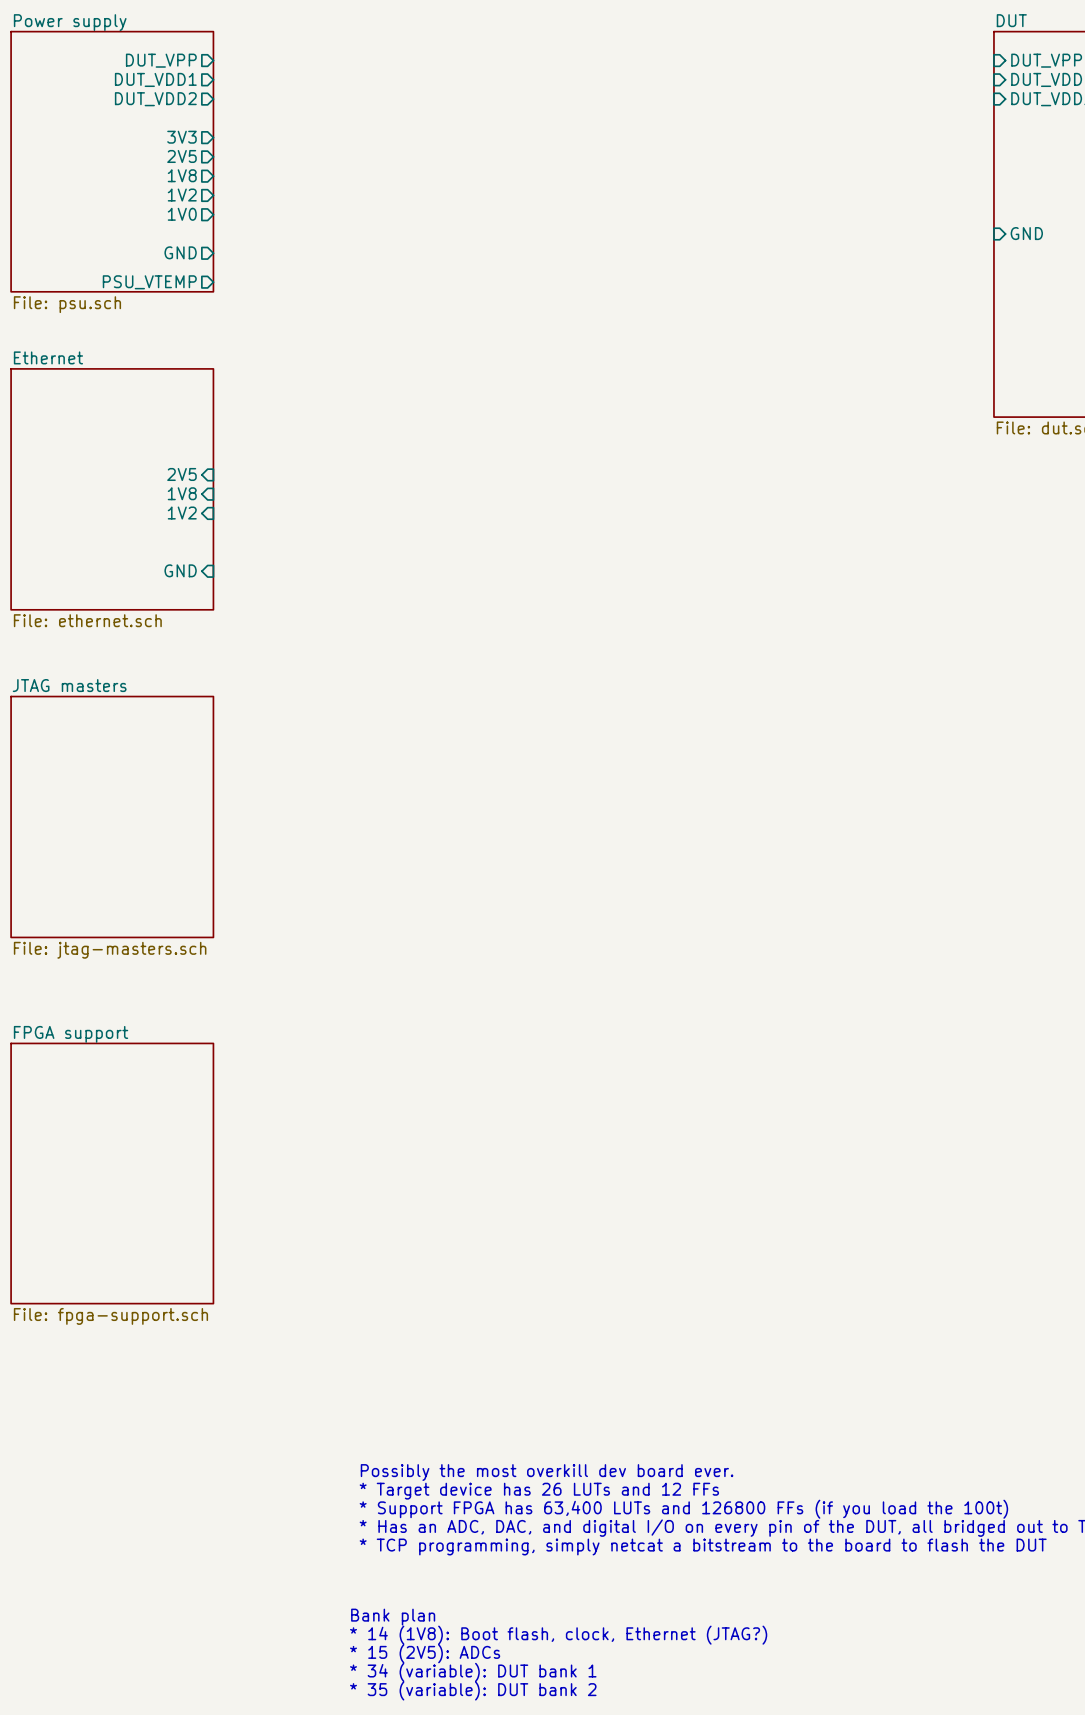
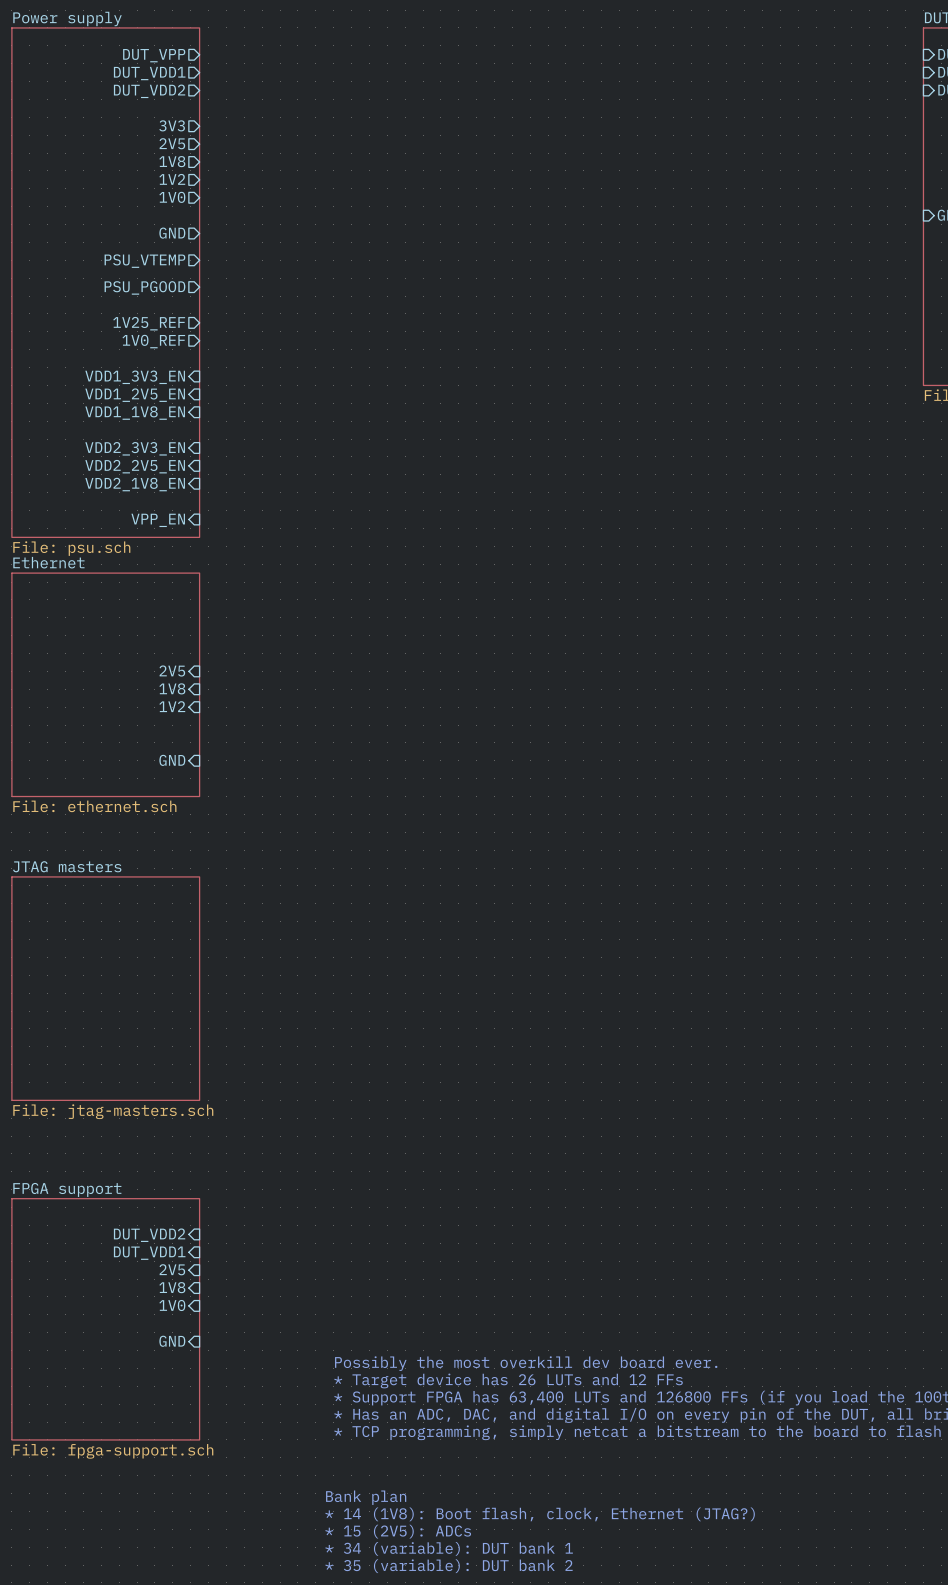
sheet Power supply: File: psu.sch (112, 161) -> none
sheet Power supply: none -> File: psu.sch (105, 282)
sheet pin: none -> PSU_PGOOD (144, 287)
sheet pin: none -> 1V25_REF (149, 323)
sheet pin: none -> 1V0_REF (153, 341)
sheet pin: none -> VDD1_3V3_EN (135, 377)
sheet pin: none -> VDD1_2V5_EN (135, 395)
sheet pin: none -> VDD1_1V8_EN (135, 413)
sheet pin: 2V5 (181, 474) -> none
sheet pin: none -> VDD2_3V3_EN (135, 448)
sheet Ethernet: File: ethernet.sch (112, 489) -> none
sheet pin: 1V8 (182, 493) -> none
sheet pin: none -> VDD2_2V5_EN (135, 466)
sheet pin: 1V2 (182, 513) -> none
sheet pin: none -> VDD2_1V8_EN (135, 484)
sheet pin: none -> VPP_EN (158, 520)
sheet pin: GND (180, 570) -> none
sheet pin: none -> 2V5 (172, 671)
sheet Ethernet: none -> File: ethernet.sch (105, 684)
sheet pin: none -> 1V8 (172, 688)
sheet pin: none -> 1V2 (172, 706)
sheet JTAG masters: File: jtag-masters.sch (112, 816) -> none
sheet pin: none -> GND (172, 760)
sheet JTAG masters: none -> File: jtag-masters.sch (105, 988)
sheet FPGA support: File: fpga-support.sch (112, 1173) -> none
sheet pin: none -> DUT_VDD2 (149, 1235)
sheet pin: none -> DUT_VDD1 (149, 1253)
sheet pin: none -> 2V5 (172, 1269)
sheet pin: none -> 1V8 (172, 1287)
sheet pin: none -> 1V0 (172, 1305)
sheet FPGA support: none -> File: fpga-support.sch (105, 1319)
sheet pin: none -> GND (172, 1341)

